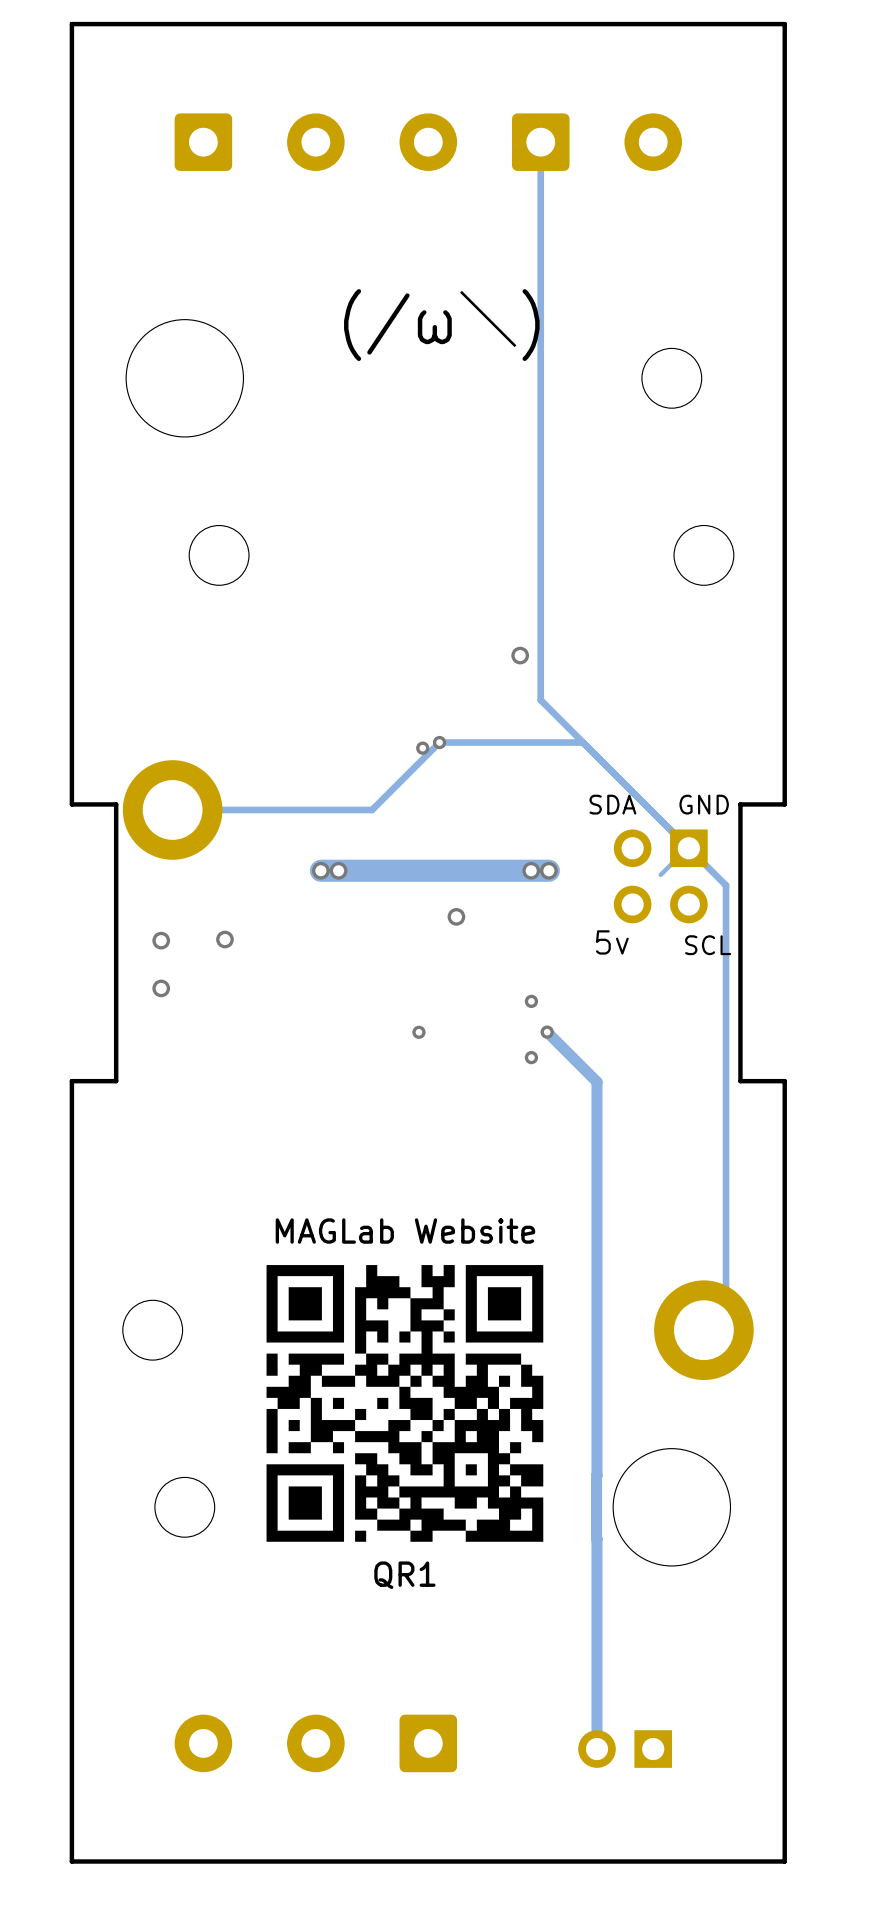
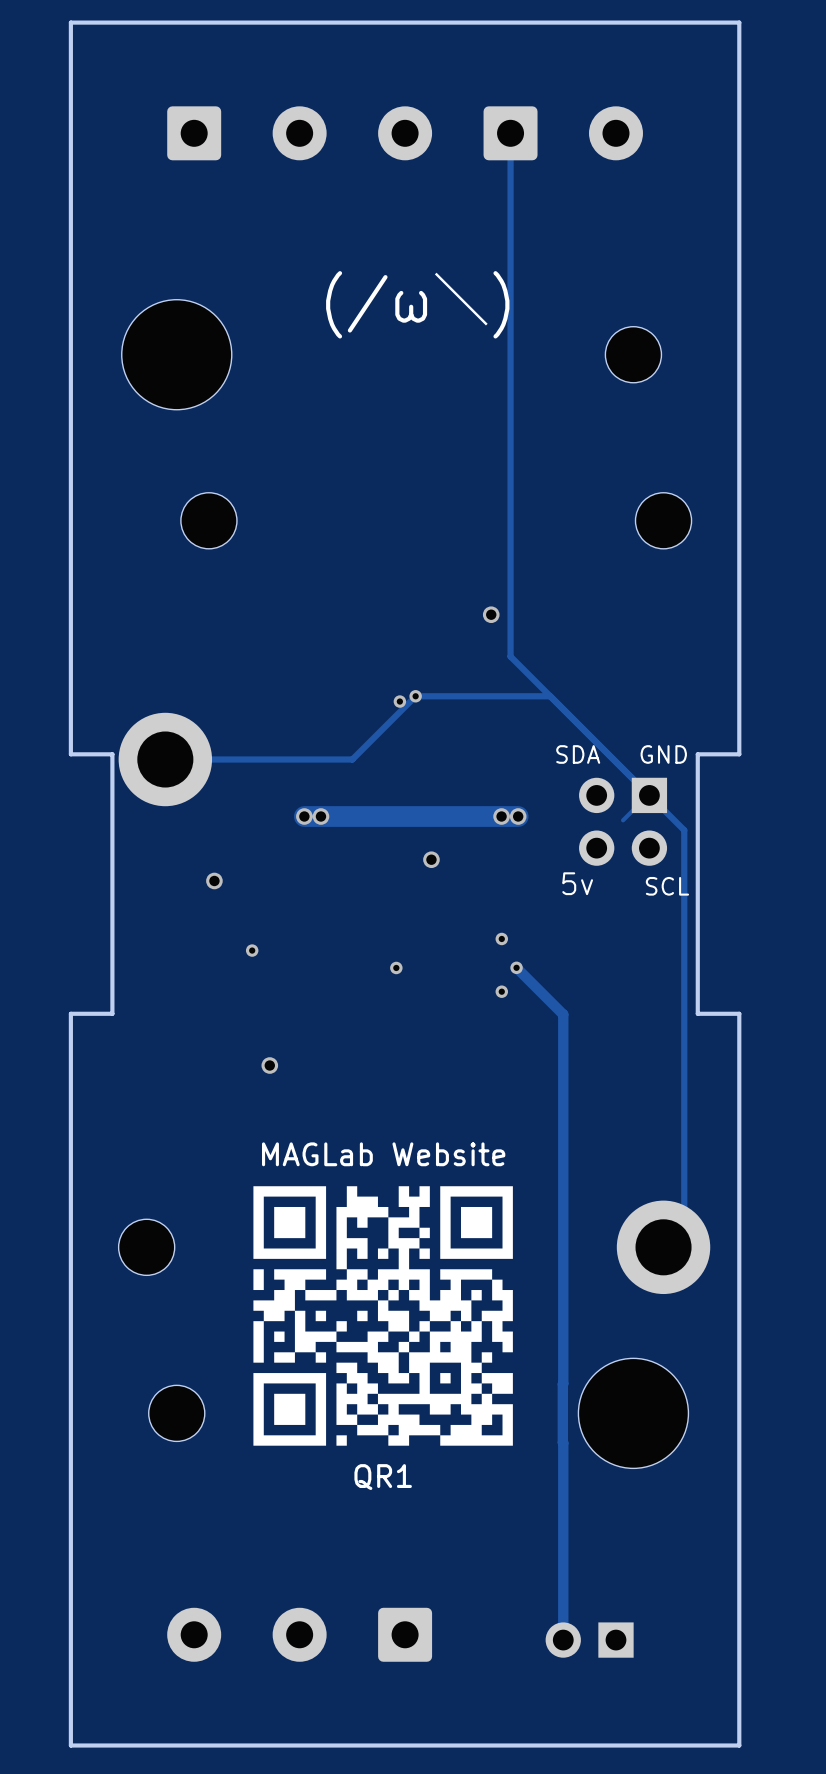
via: (161, 940) -> none
via: (161, 988) -> none
via: none -> (252, 950)
via: none -> (269, 1065)

